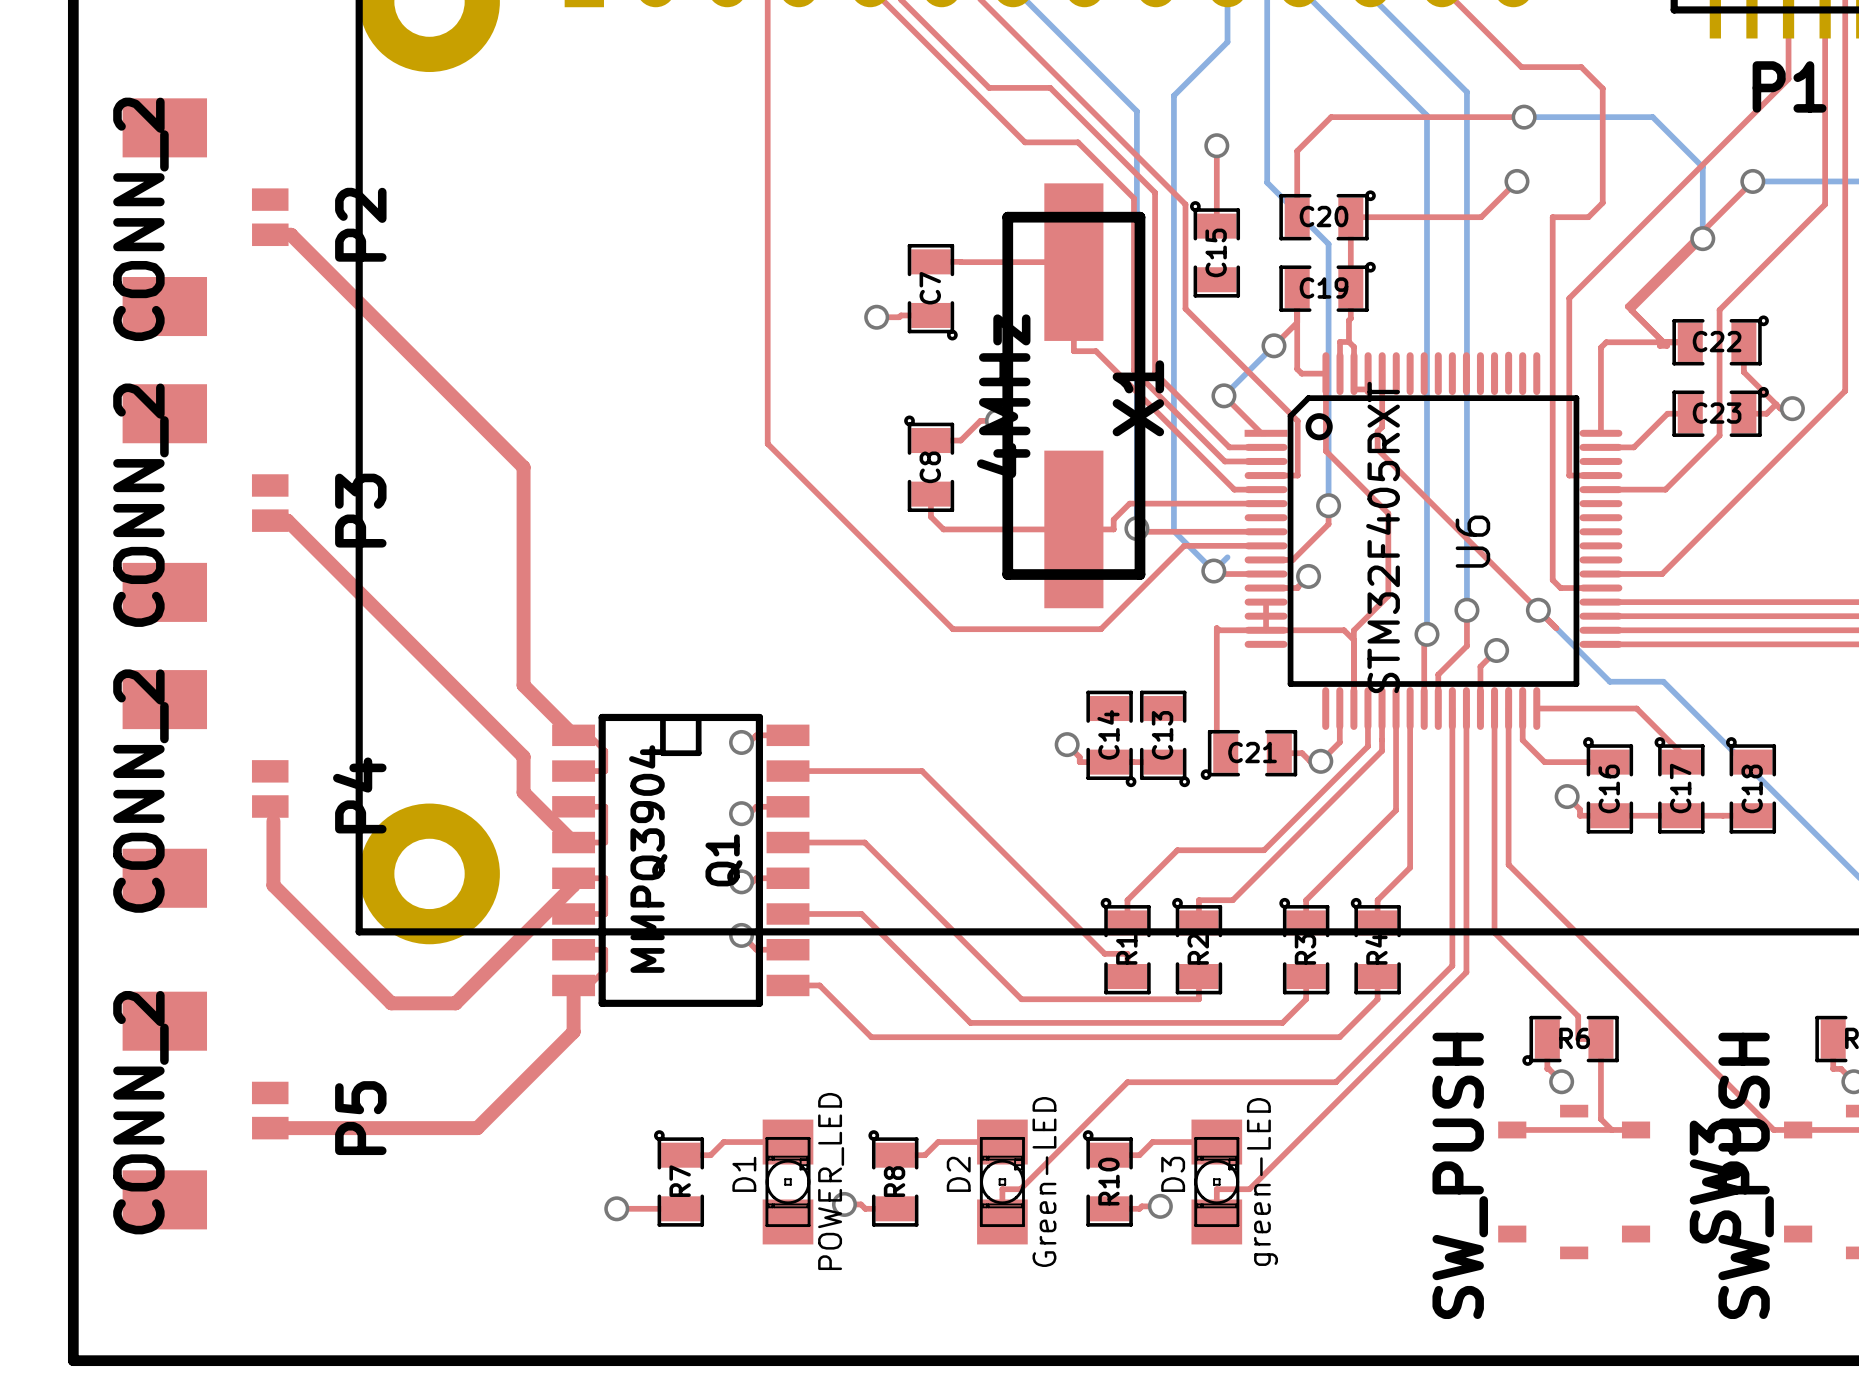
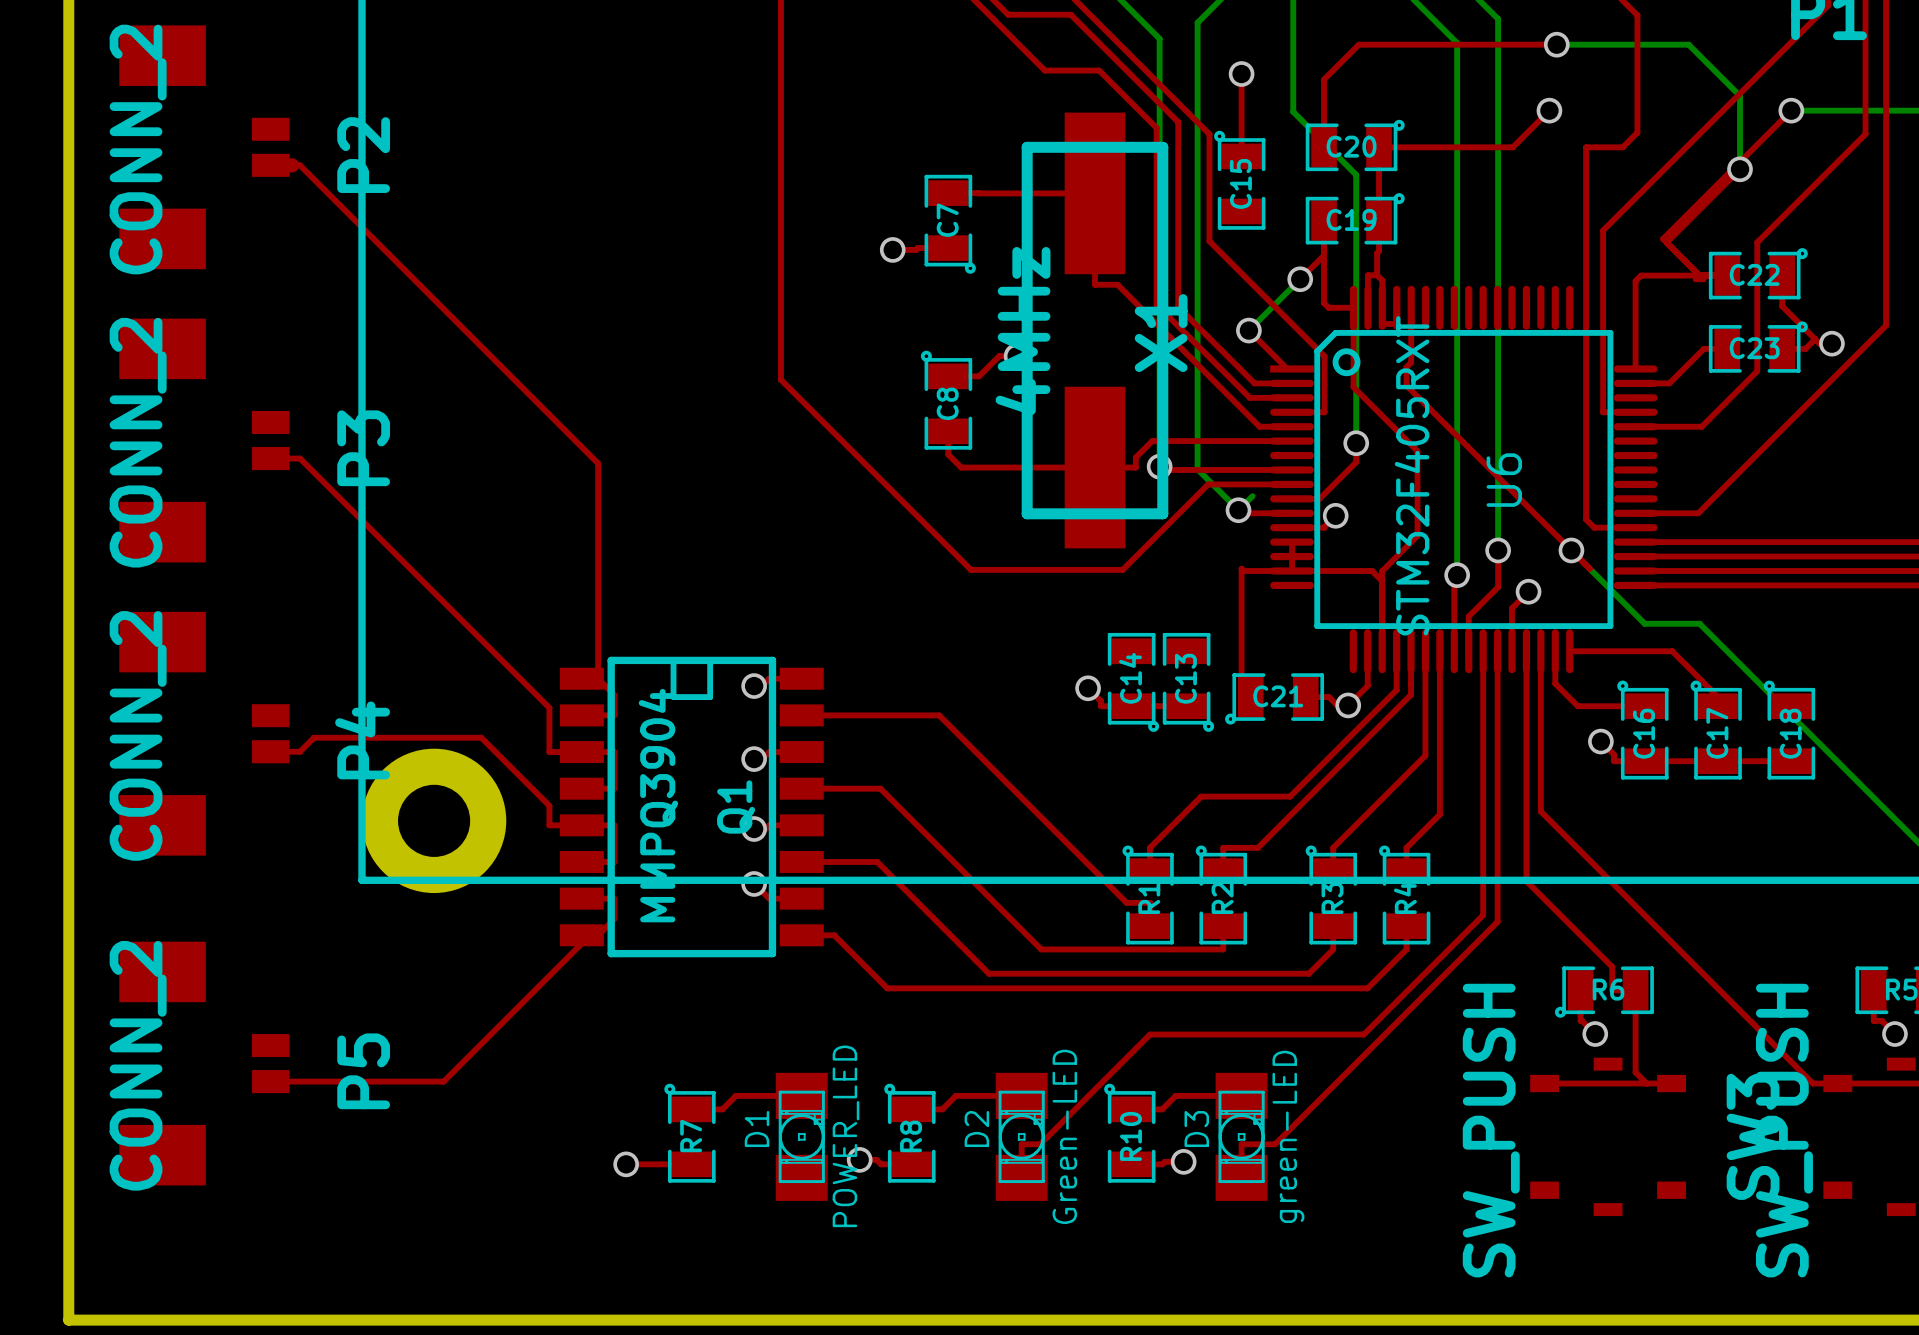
top track: (291, 234) (523, 467) (523, 685) (573, 735) -> (292, 165) (300, 165) (598, 463) (598, 678)
top track: (287, 520) (523, 756) (523, 792) (573, 842) -> (288, 458) (300, 458) (549, 707) (549, 752) (581, 752)
top track: (273, 821) (273, 885) (391, 1003) (455, 1003) (573, 885) (573, 878) -> (270, 751) (300, 751) (314, 737) (481, 737) (549, 805) (549, 825) (581, 825)
top track: (573, 985) (573, 1031) (477, 1128) (438, 1128) -> (590, 935) (443, 1081)
top track width: thick (270, 1128) (438, 1128) -> thin (270, 1081) (443, 1081)

